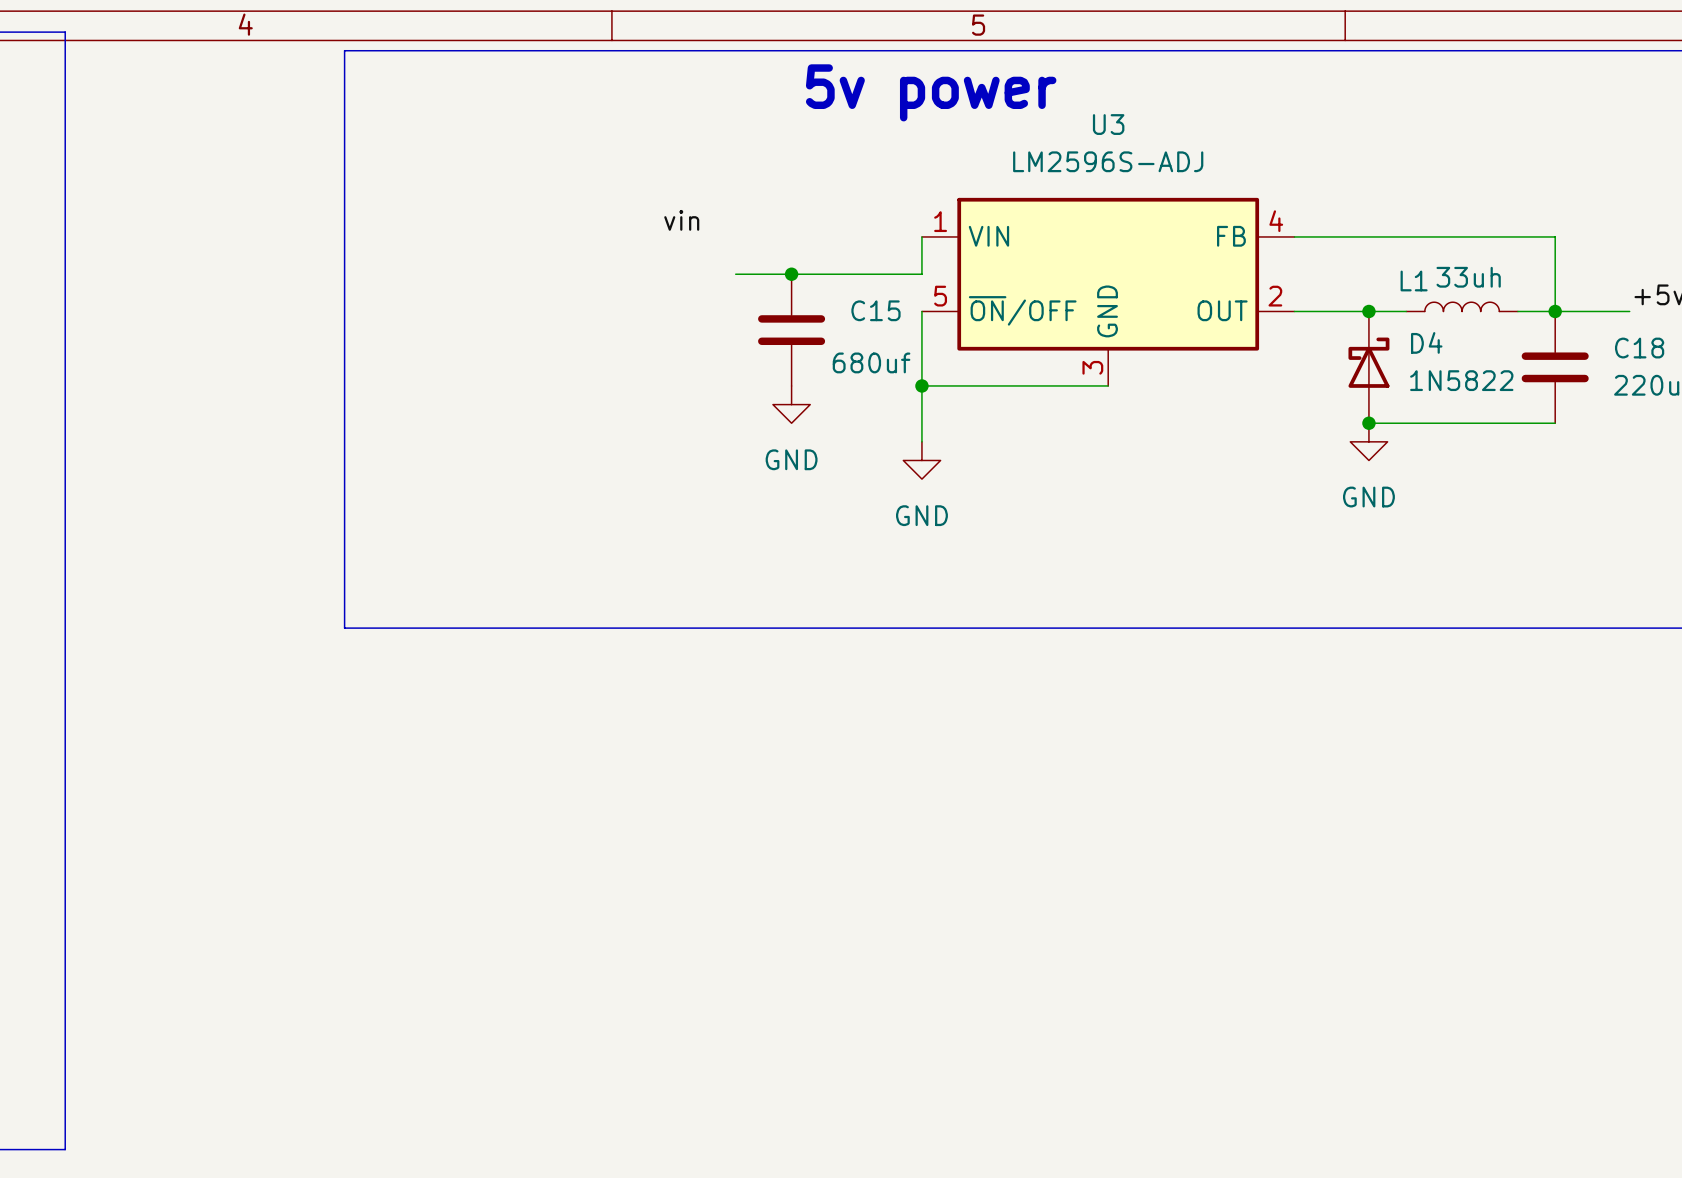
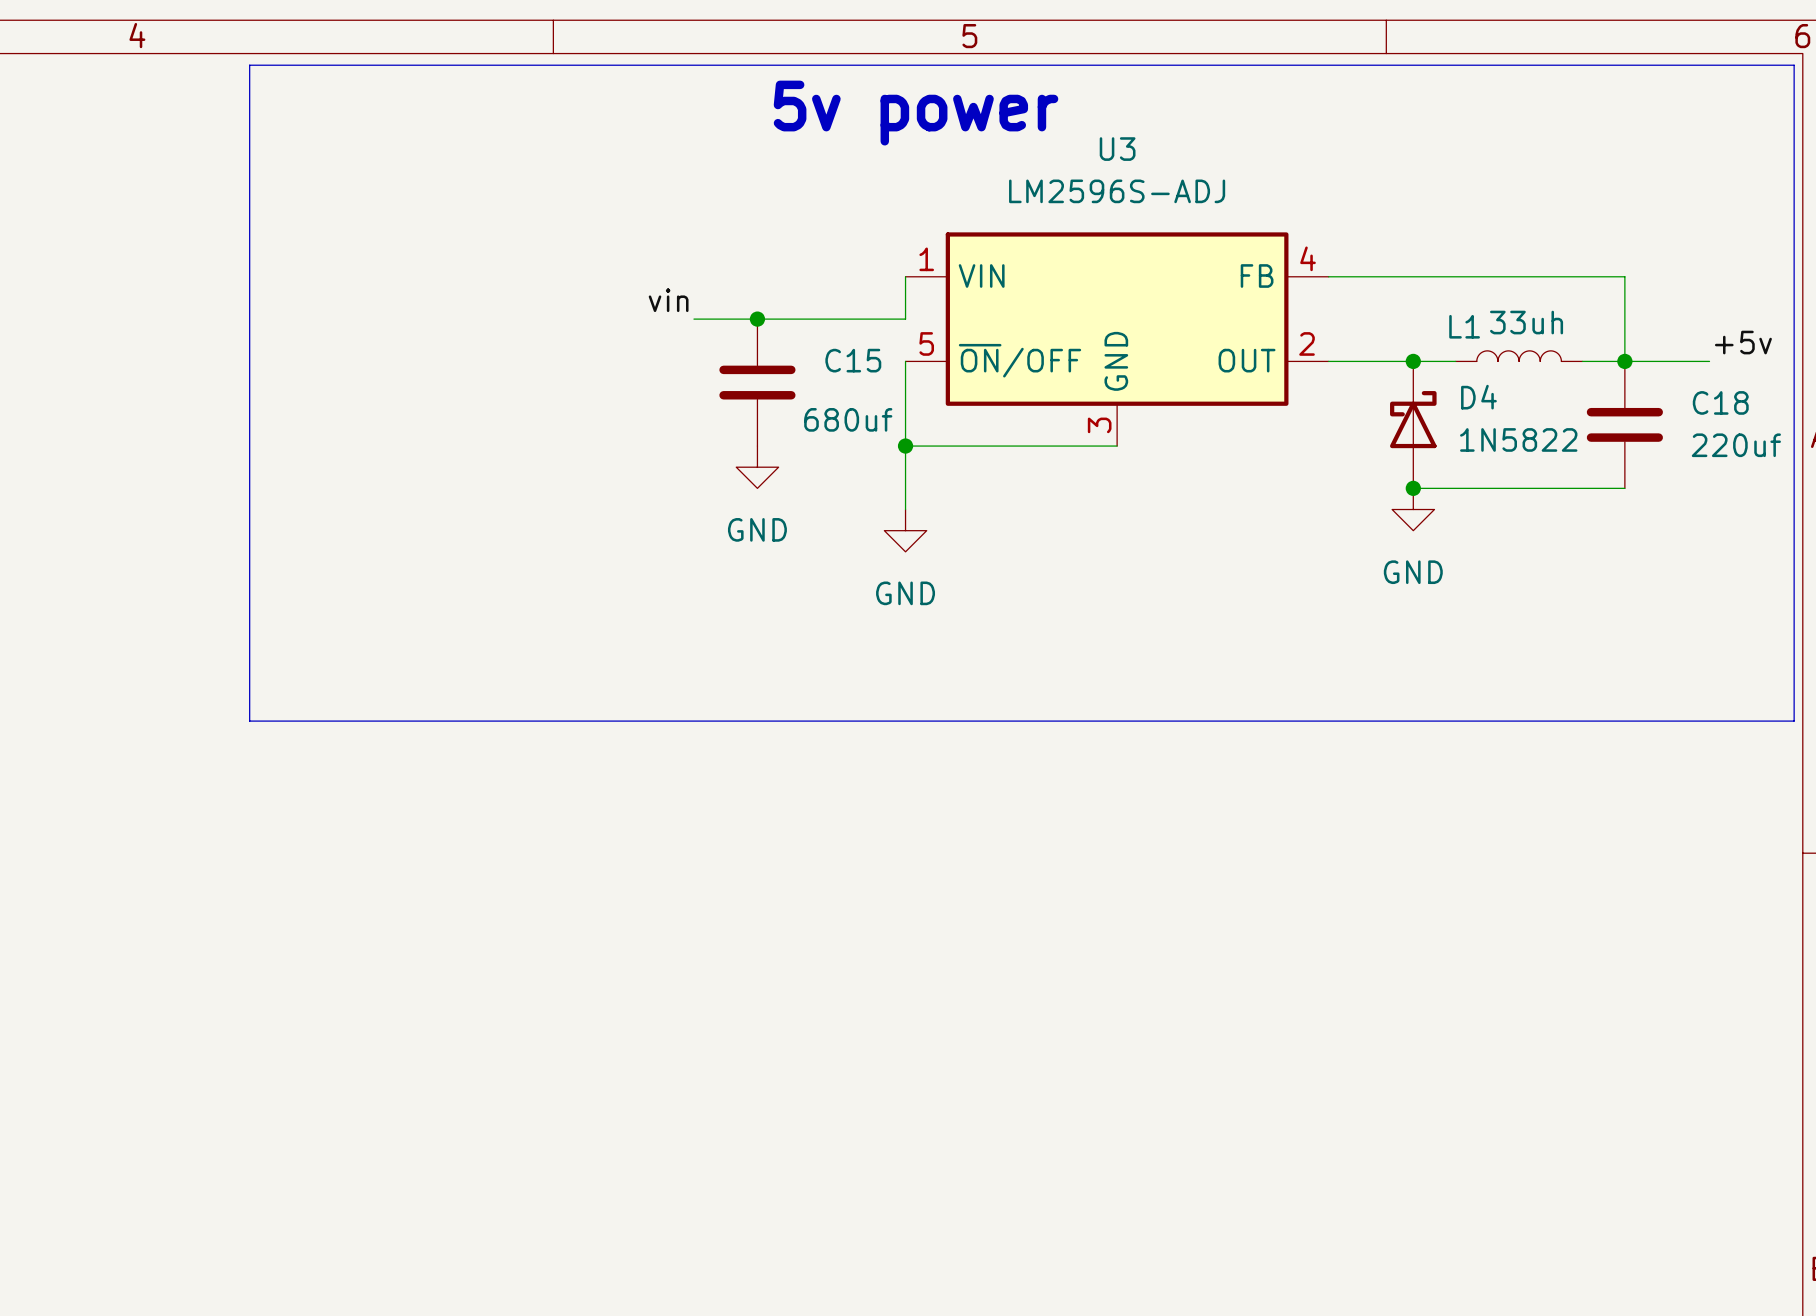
label position: vin (681, 220) -> vin (668, 300)

